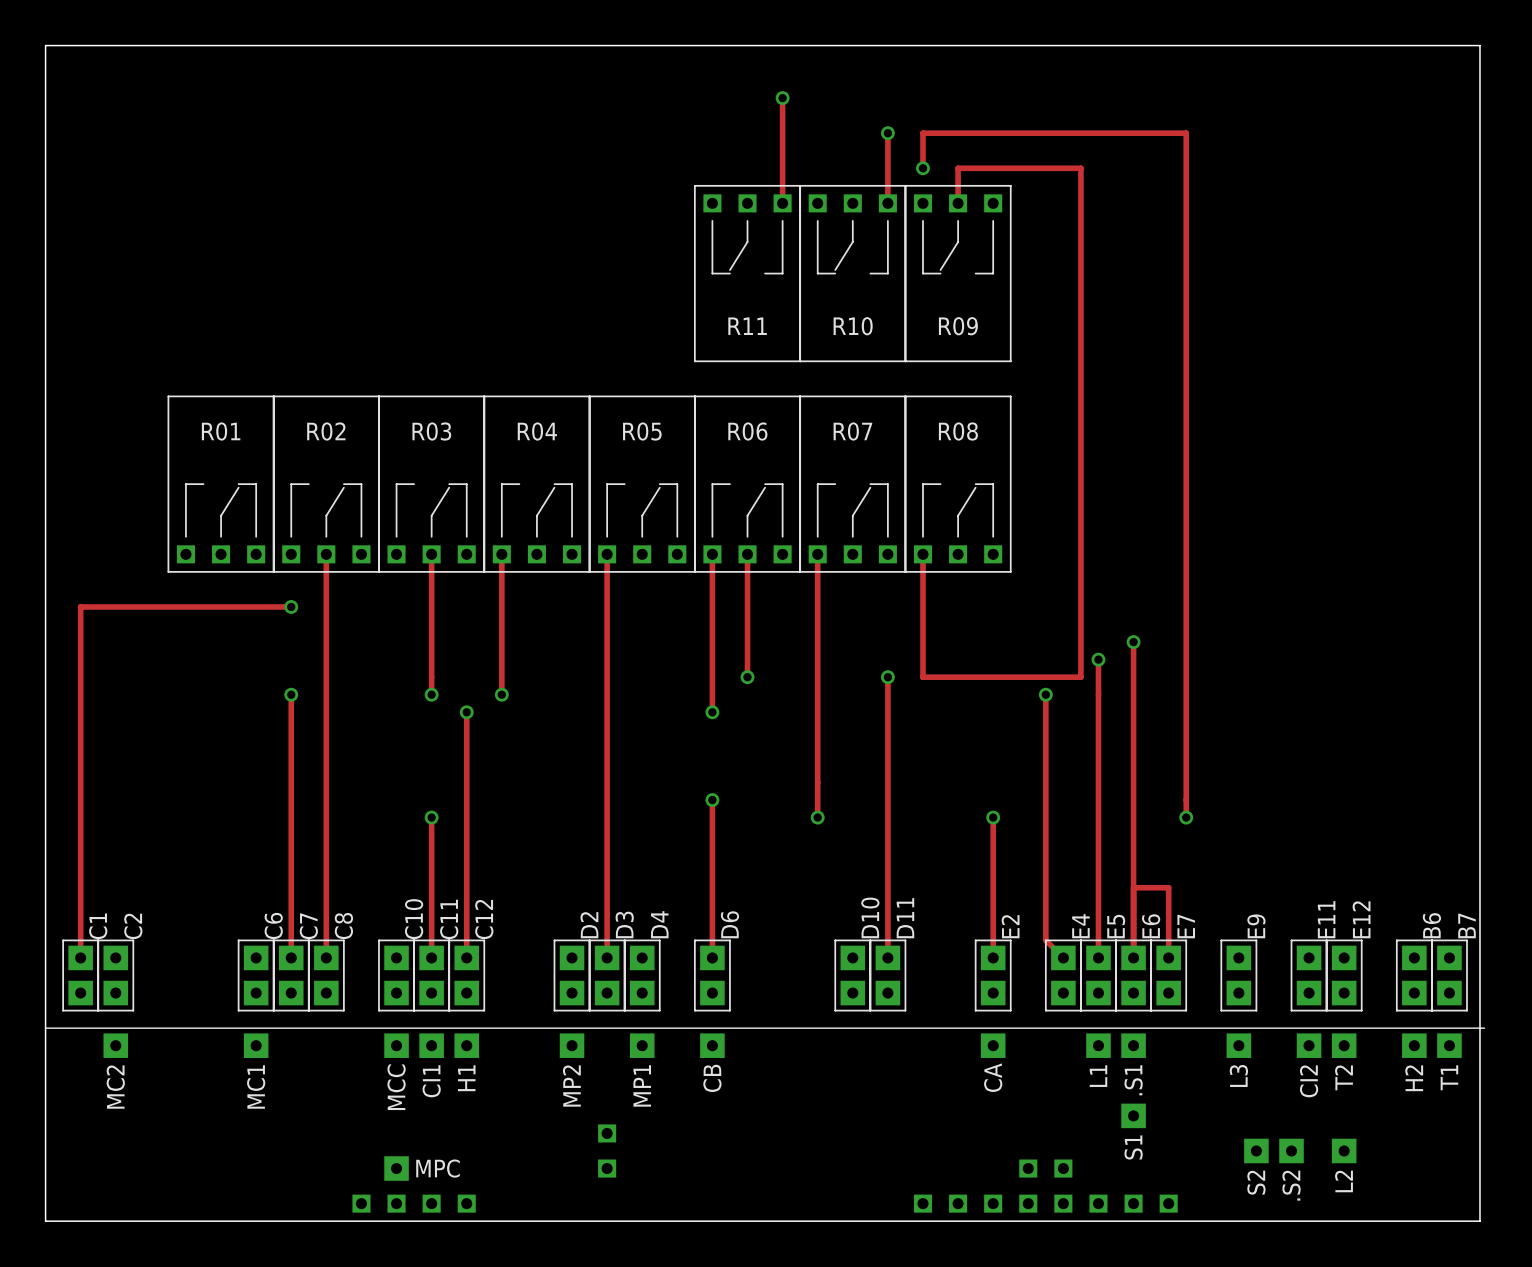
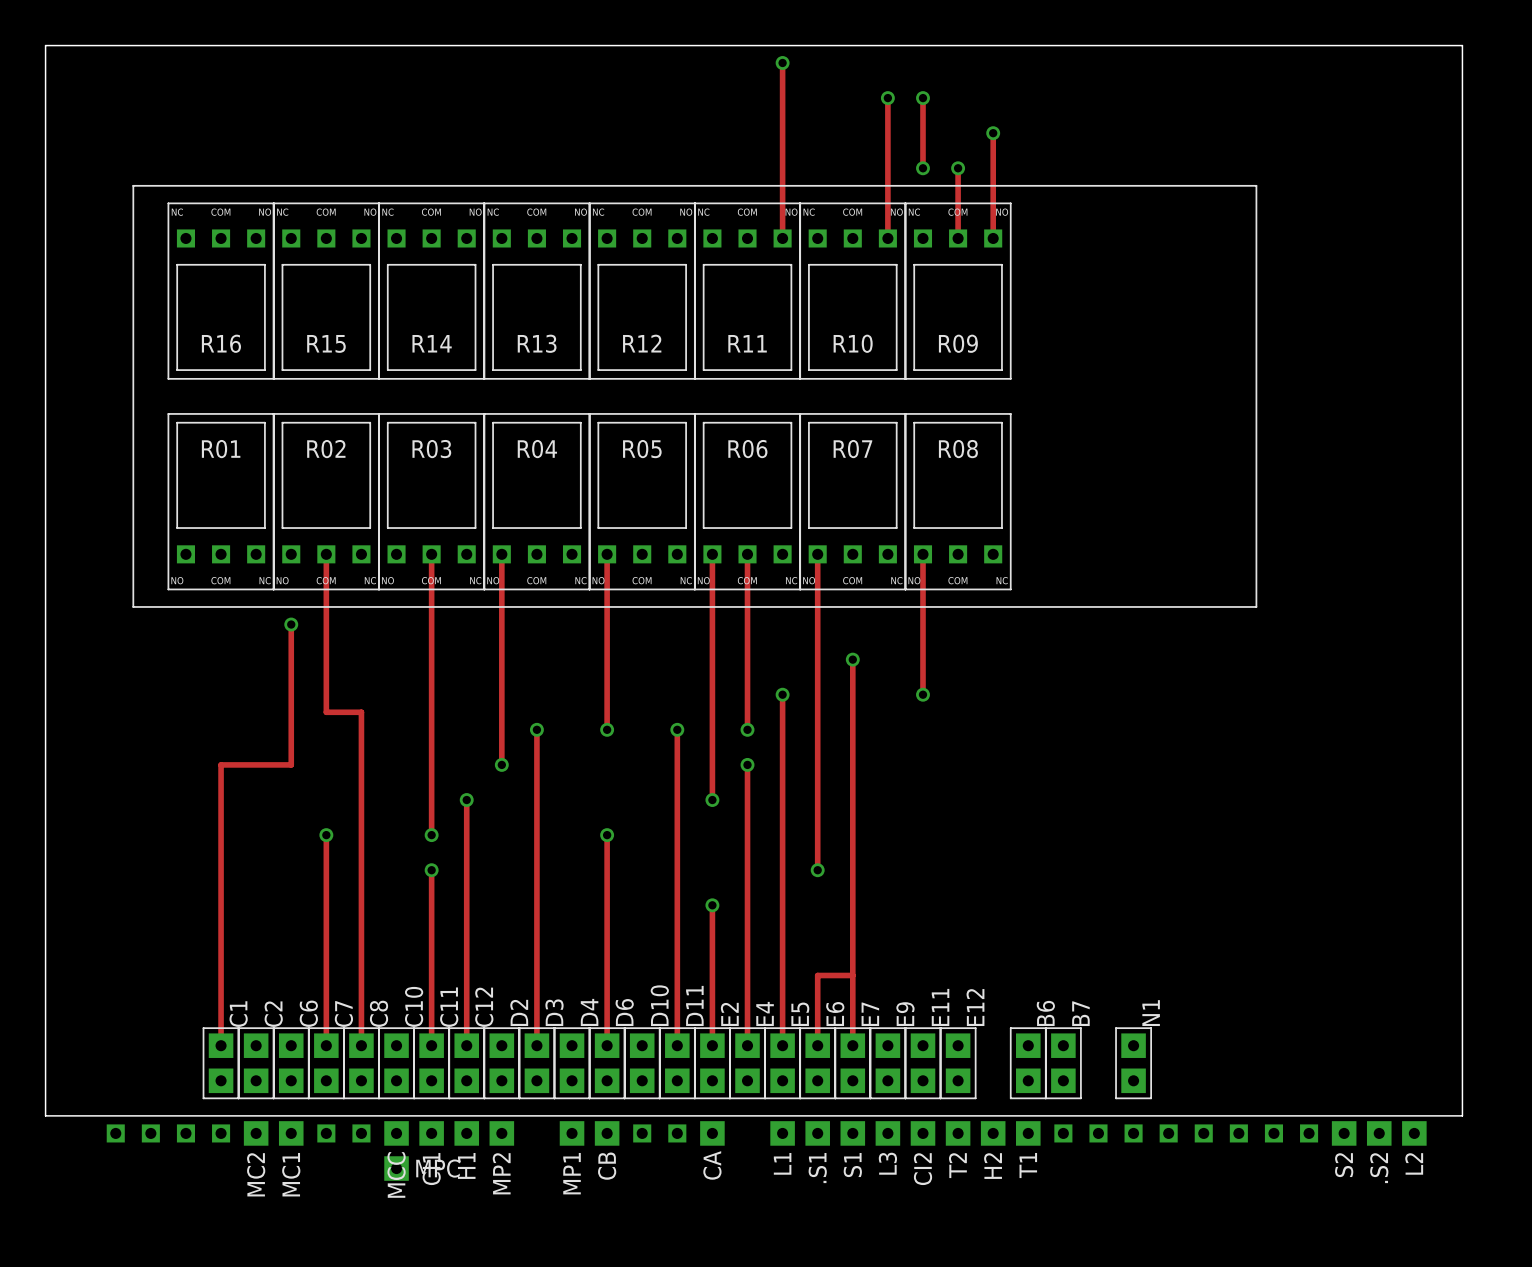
board edge: (1462, 45) (1479, 45) (1479, 1221) (45, 1221) (45, 1115) -> (1462, 45) (1462, 1115) (45, 1115)
track: none -> (782, 62) (782, 98)
via position: (782, 98) -> (782, 62)
track: none -> (887, 98) (887, 133)
via: none -> (887, 98)
via: none -> (922, 98)
via: (887, 133) -> none
track: (922, 133) (1186, 133) (1186, 817) -> (922, 133) (922, 98)
track: none -> (993, 133) (993, 238)
via: none -> (993, 133)
track: (958, 168) (1080, 168) (1080, 677) (922, 677) -> (922, 694) (922, 677)
via: none -> (958, 168)
R11 footprint: [693, 184, 802, 363] -> [693, 202, 802, 380]
R10 footprint: [799, 184, 907, 363] -> [799, 202, 907, 380]
R09 footprint: [904, 184, 1012, 363] -> [904, 202, 1012, 380]
line: none -> (133, 185) (133, 606) (1256, 606) (1256, 185) (133, 185)
track: none -> (782, 203) (782, 238)
track: none -> (887, 203) (887, 238)
track: none -> (958, 203) (958, 238)
R16: none -> (221, 291)
R15: none -> (326, 291)
R14: none -> (431, 291)
R13: none -> (536, 291)
R12: none -> (642, 291)
R01 footprint: [167, 395, 275, 573] -> [167, 413, 275, 591]
R02 footprint: [272, 395, 380, 573] -> [272, 413, 380, 591]
R03 footprint: [378, 395, 486, 573] -> [378, 413, 486, 591]
R04 footprint: [483, 395, 591, 573] -> [483, 413, 591, 591]
R05 footprint: [588, 395, 696, 573] -> [588, 413, 696, 591]
R06 footprint: [693, 395, 802, 573] -> [693, 413, 802, 591]
R07 footprint: [799, 395, 907, 573] -> [799, 413, 907, 591]
R08 footprint: [904, 395, 1012, 573] -> [904, 413, 1012, 591]
track: (291, 606) (80, 606) (80, 957) -> none
via position: (291, 606) -> (291, 624)
track: none -> (291, 624) (291, 694)
track: (1133, 642) (1133, 957) -> none
via: (1133, 642) -> none
track: none -> (852, 659) (852, 1045)
via: none -> (852, 659)
track: (1098, 659) (1098, 957) -> none
via: (1098, 659) -> none
track: none -> (747, 677) (747, 729)
via: (747, 677) -> none
track: (887, 677) (887, 957) -> (747, 764) (747, 1045)
via: (887, 677) -> none
via: (291, 694) -> none
track: none -> (431, 694) (431, 817)
via: (431, 694) -> none
track: none -> (501, 694) (501, 764)
via: (501, 694) -> none
track: none -> (782, 694) (782, 1045)
via: none -> (782, 694)
via: none -> (922, 694)
track: (1045, 694) (1045, 940) (1063, 957) -> none
via: (1045, 694) -> none
track: (326, 712) (326, 835) -> (326, 712) (361, 712) (361, 1045)
track: (466, 712) (466, 800) -> (466, 957) (466, 1045)
via: (466, 712) -> none
via: (712, 712) -> none
track: none -> (536, 729) (536, 1045)
via: none -> (536, 729)
track: (607, 729) (607, 835) -> none
via: none -> (607, 729)
track: none -> (677, 729) (677, 1045)
via: none -> (677, 729)
via: none -> (747, 729)
track: (291, 764) (291, 957) -> (291, 764) (221, 764) (221, 1045)
via: none -> (501, 764)
via: none -> (747, 764)
via: none -> (466, 800)
track: (712, 800) (712, 905) -> (712, 800) (712, 712)
via position: (431, 817) -> (431, 835)
track: none -> (817, 817) (817, 870)
via: (817, 817) -> none
track: (993, 817) (993, 957) -> none
via: (993, 817) -> none
via: (1186, 817) -> none
via: none -> (326, 835)
track: (431, 835) (431, 870) -> none
via: none -> (607, 835)
via: none -> (431, 870)
via: none -> (817, 870)
track: (1133, 887) (1168, 887) (1168, 957) -> none
via: none -> (712, 905)
track: none -> (326, 957) (326, 1045)
track: none -> (431, 957) (431, 1045)
track: none -> (607, 957) (607, 1045)
track: none -> (712, 957) (712, 1045)
C1 position: (80, 975) -> (221, 1063)
C2 position: (115, 975) -> (256, 1063)
C6 position: (256, 975) -> (291, 1063)
C7 position: (291, 975) -> (326, 1063)
C8 position: (326, 975) -> (361, 1063)
C10 position: (396, 975) -> (396, 1063)
C11 position: (431, 975) -> (431, 1063)
C12 position: (466, 975) -> (466, 1063)
D2 position: (572, 975) -> (501, 1063)
D3 position: (607, 975) -> (536, 1063)
D4 position: (642, 975) -> (572, 1063)
D6 position: (712, 975) -> (607, 1063)
track: none -> (852, 975) (817, 975) (817, 1045)
D10 position: (852, 975) -> (642, 1063)
D11 position: (887, 975) -> (677, 1063)
E2 position: (993, 975) -> (712, 1063)
E4 position: (1063, 975) -> (747, 1063)
E5 position: (1098, 975) -> (782, 1063)
E6 position: (1133, 975) -> (817, 1063)
E7 position: (1168, 975) -> (852, 1063)
E9 position: (1238, 975) -> (887, 1063)
E11 position: (1309, 975) -> (922, 1063)
E12 position: (1344, 975) -> (958, 1063)
B6 position: (1414, 975) -> (1028, 1063)
B7 position: (1449, 975) -> (1063, 1063)
line: (45, 1028) (1484, 1028) -> none
MC2 position: (115, 1045) -> (256, 1133)
MC1 position: (256, 1045) -> (291, 1133)
MCC position: (396, 1045) -> (396, 1133)
CI1 position: (431, 1045) -> (431, 1133)
H1 position: (466, 1045) -> (466, 1133)
MP2 position: (572, 1045) -> (501, 1133)
MP1 position: (642, 1045) -> (572, 1133)
CB position: (712, 1045) -> (607, 1133)
CA position: (993, 1045) -> (712, 1133)
L1 position: (1098, 1045) -> (782, 1133)
.S1 position: (1133, 1045) -> (817, 1133)
L3 position: (1238, 1045) -> (887, 1133)
CI2 position: (1309, 1045) -> (922, 1133)
T2 position: (1344, 1045) -> (958, 1133)
H2 position: (1414, 1045) -> (993, 1133)
T1 position: (1449, 1045) -> (1028, 1133)
N1: none -> (1133, 1063)
S1 position: (1133, 1115) -> (852, 1133)
part: none -> (343, 1133)
part rotation: 0° (607, 1150) -> 90° clockwise (659, 1133)
part position: (607, 1150) -> (659, 1133)
S2 position: (1256, 1150) -> (1344, 1133)
.S2 position: (1291, 1150) -> (1379, 1133)
L2 position: (1344, 1150) -> (1414, 1133)
part: (1045, 1168) -> none
part position: (414, 1203) -> (168, 1133)
part position: (1045, 1203) -> (1186, 1133)

